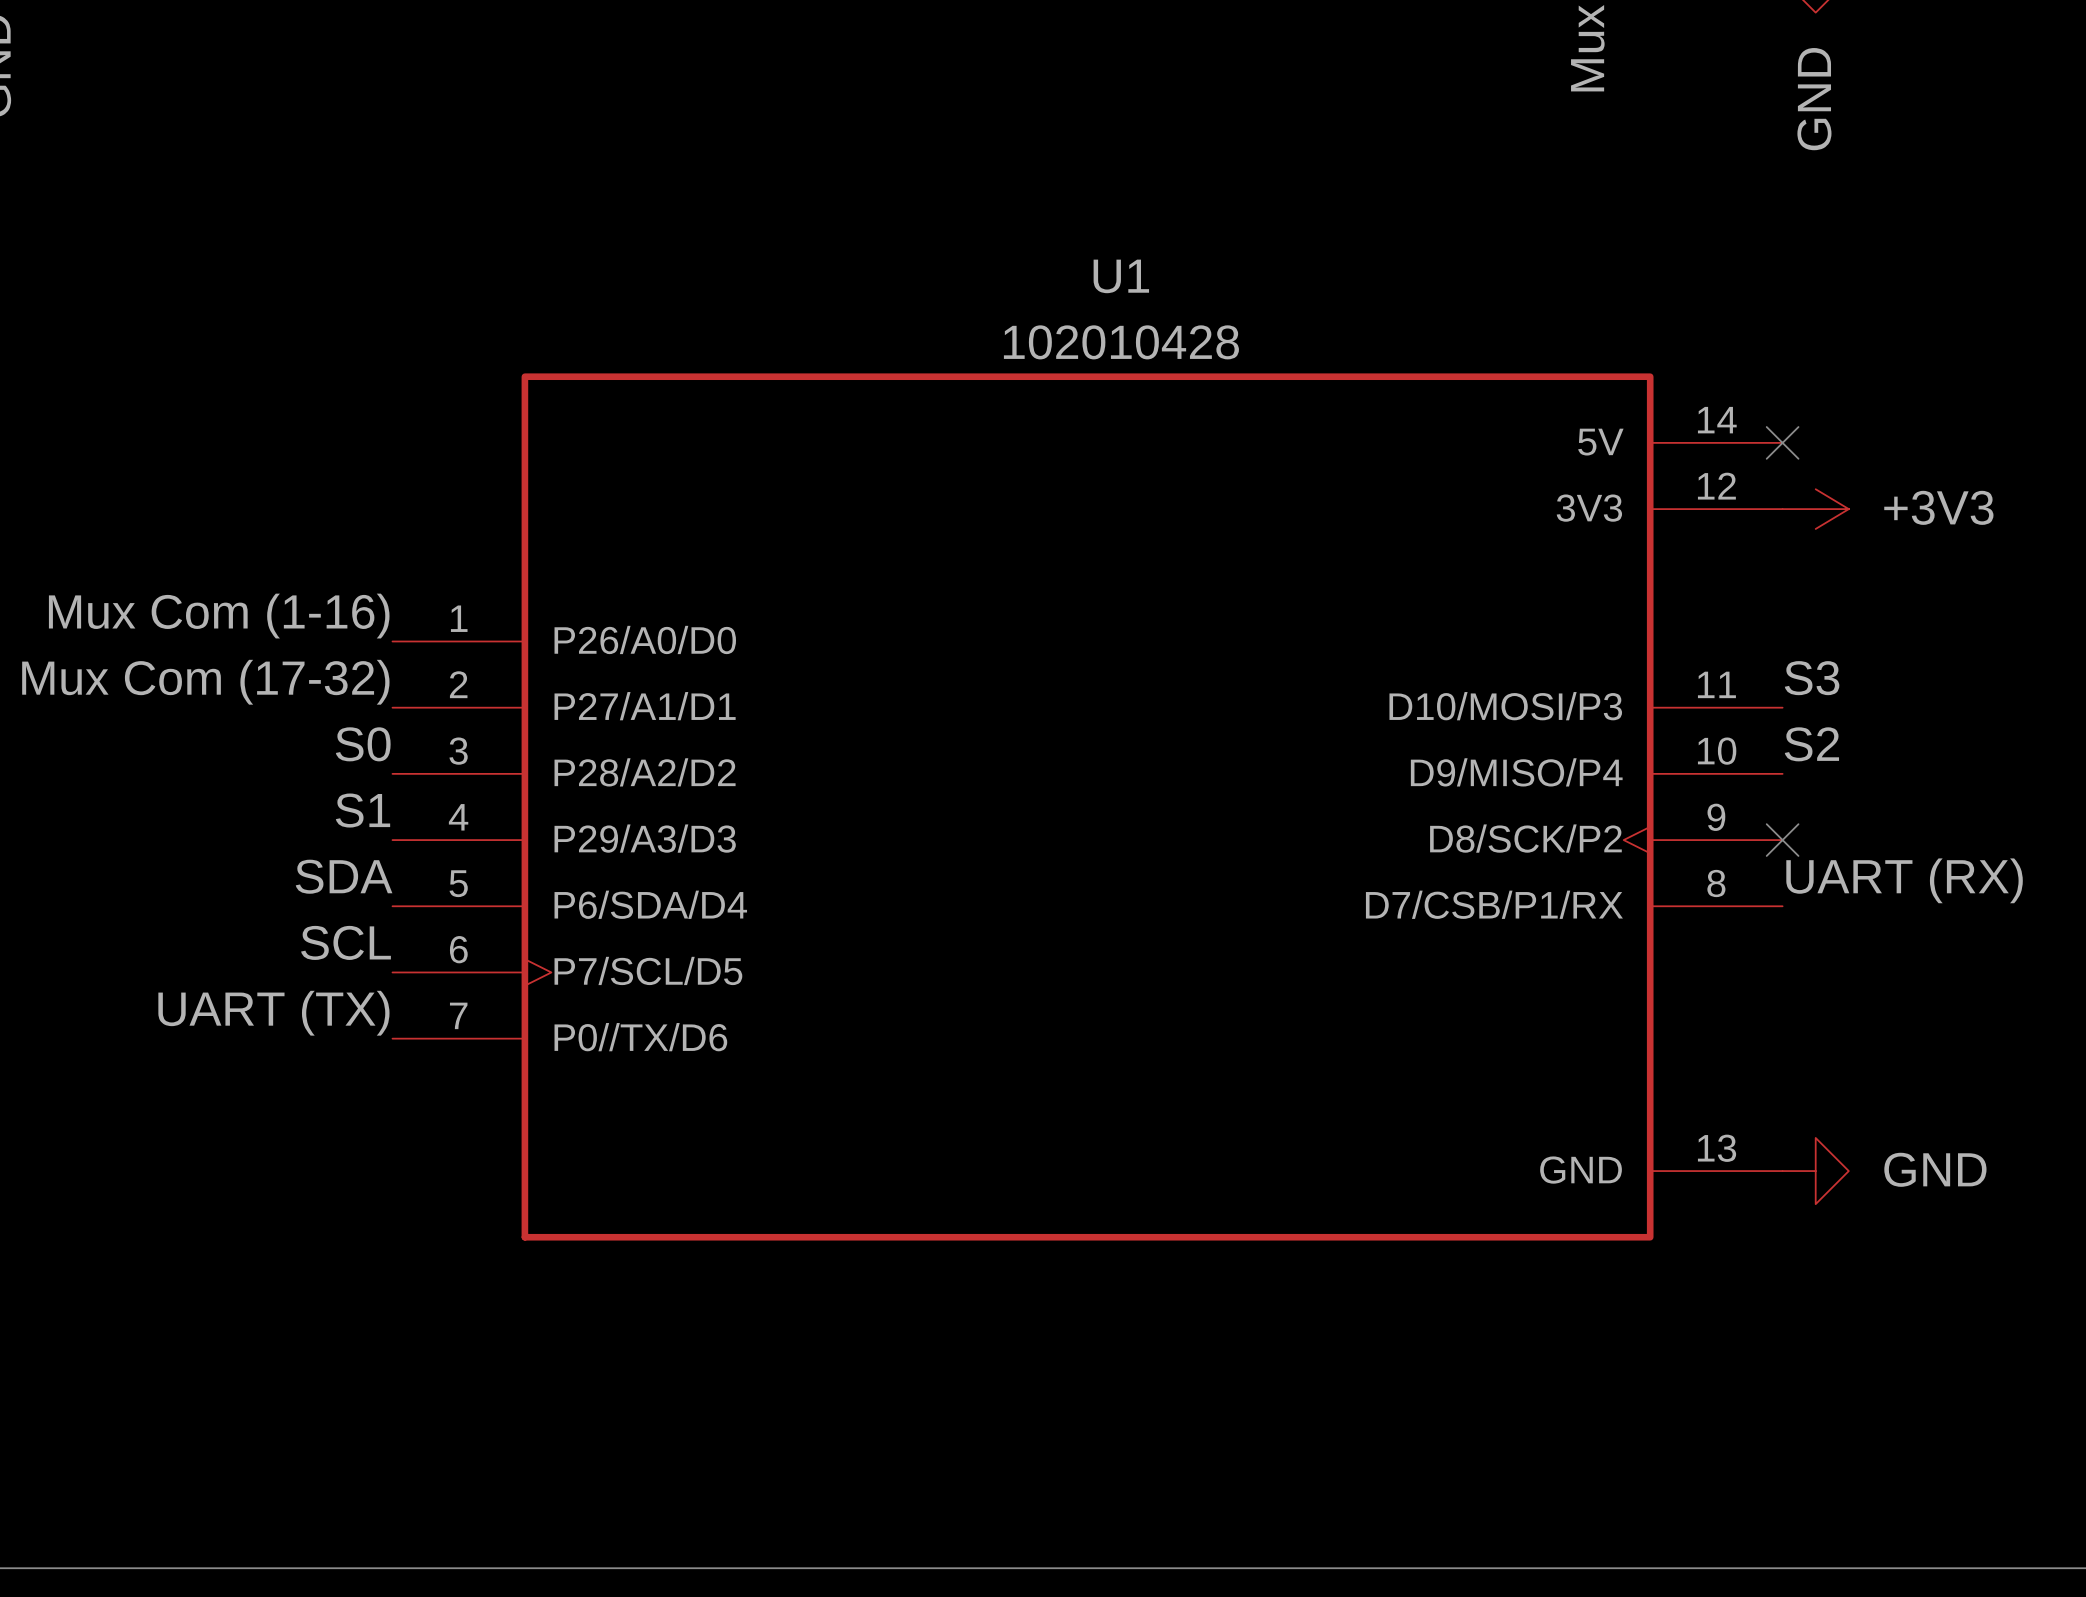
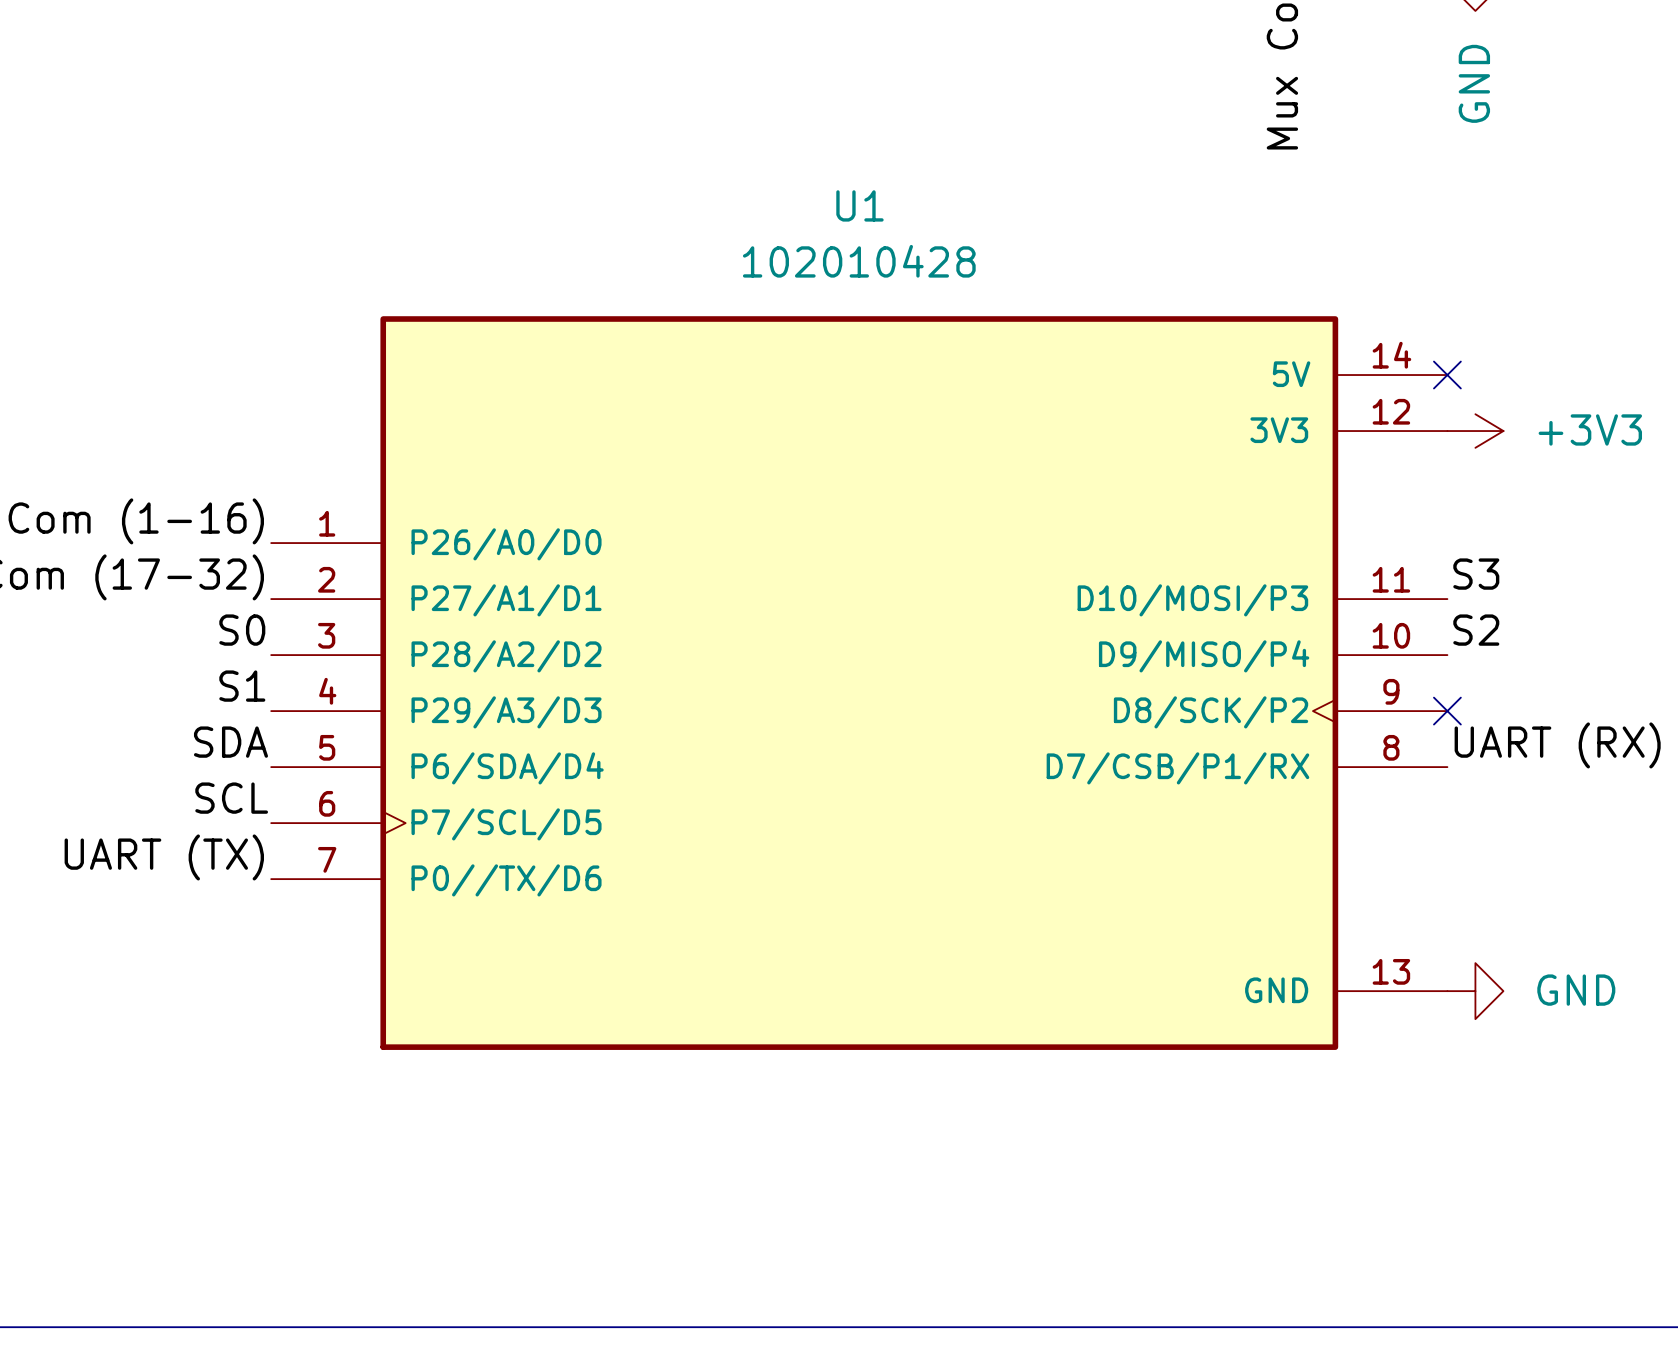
U1 name position: U1 (1121, 276) -> U1 (859, 205)
U1 value position: 102010428 (1121, 342) -> 102010428 (859, 261)

